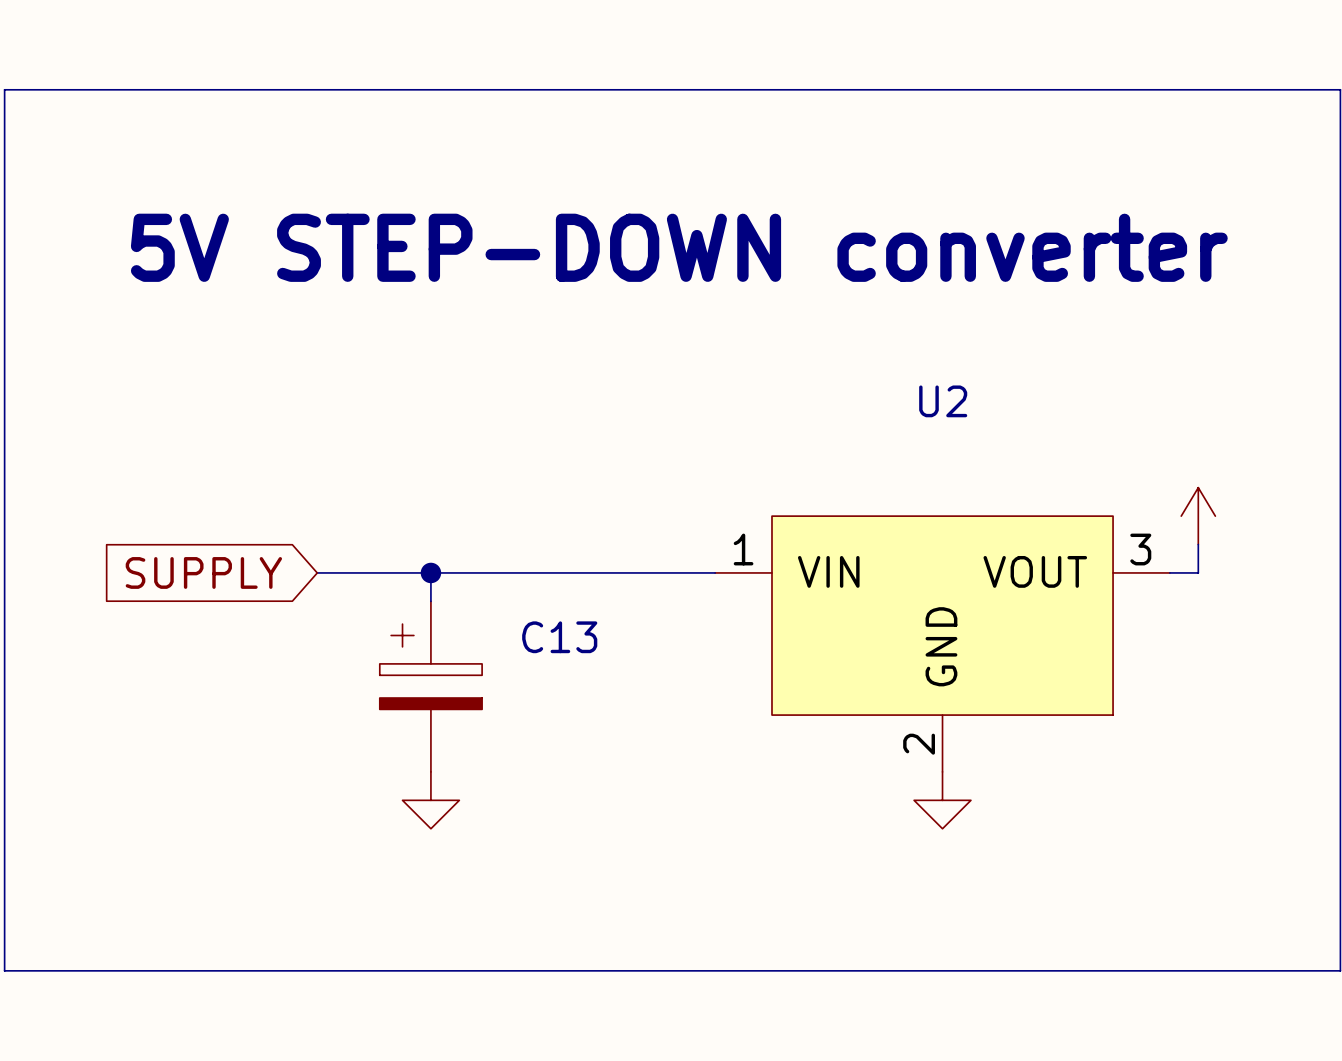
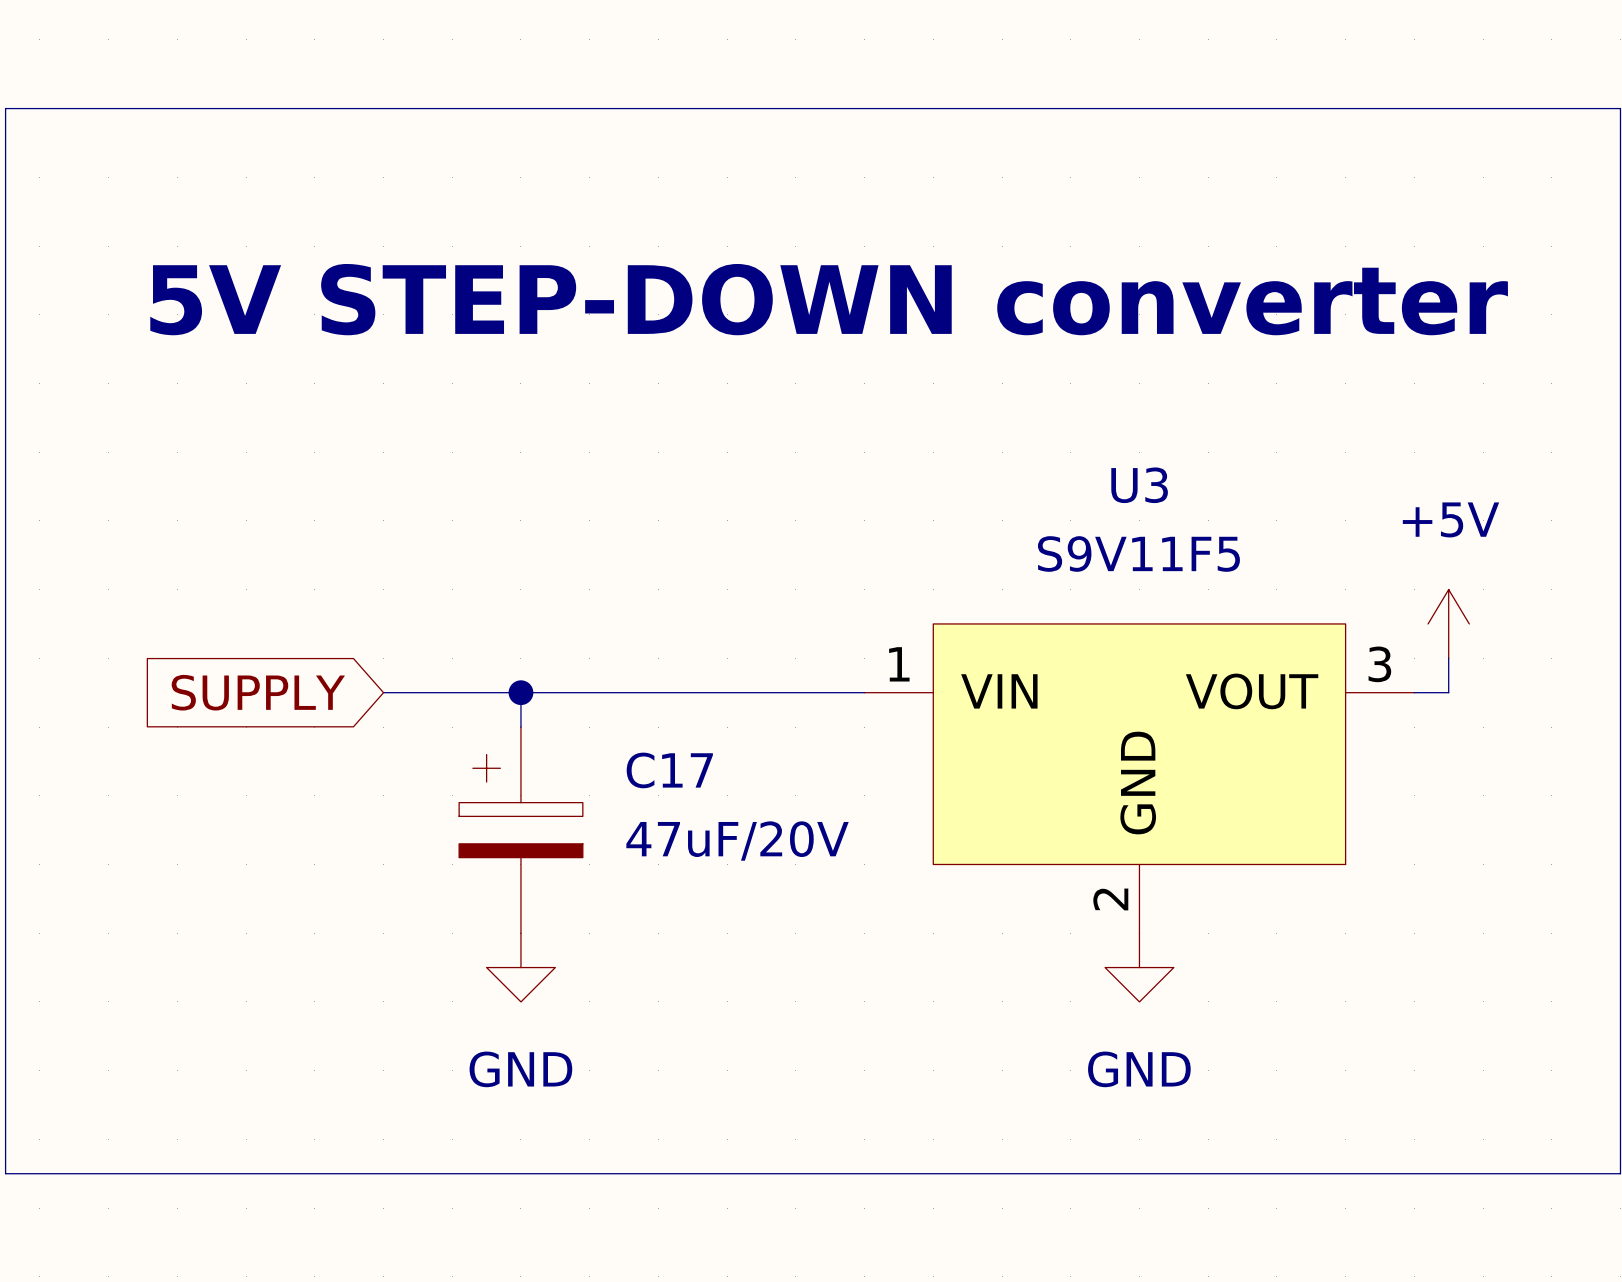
U2 name: U2 (943, 401) -> U3 (1139, 485)
power symbol text: none -> +5V (1450, 519)
U2 value: none -> S9V11F5 (1138, 553)
C13 name: C13 (559, 637) -> C17 (669, 770)
C13 value: none -> 47uF/20V (737, 841)
power symbol text: none -> GND (520, 1069)
power symbol text: none -> GND (1139, 1069)

